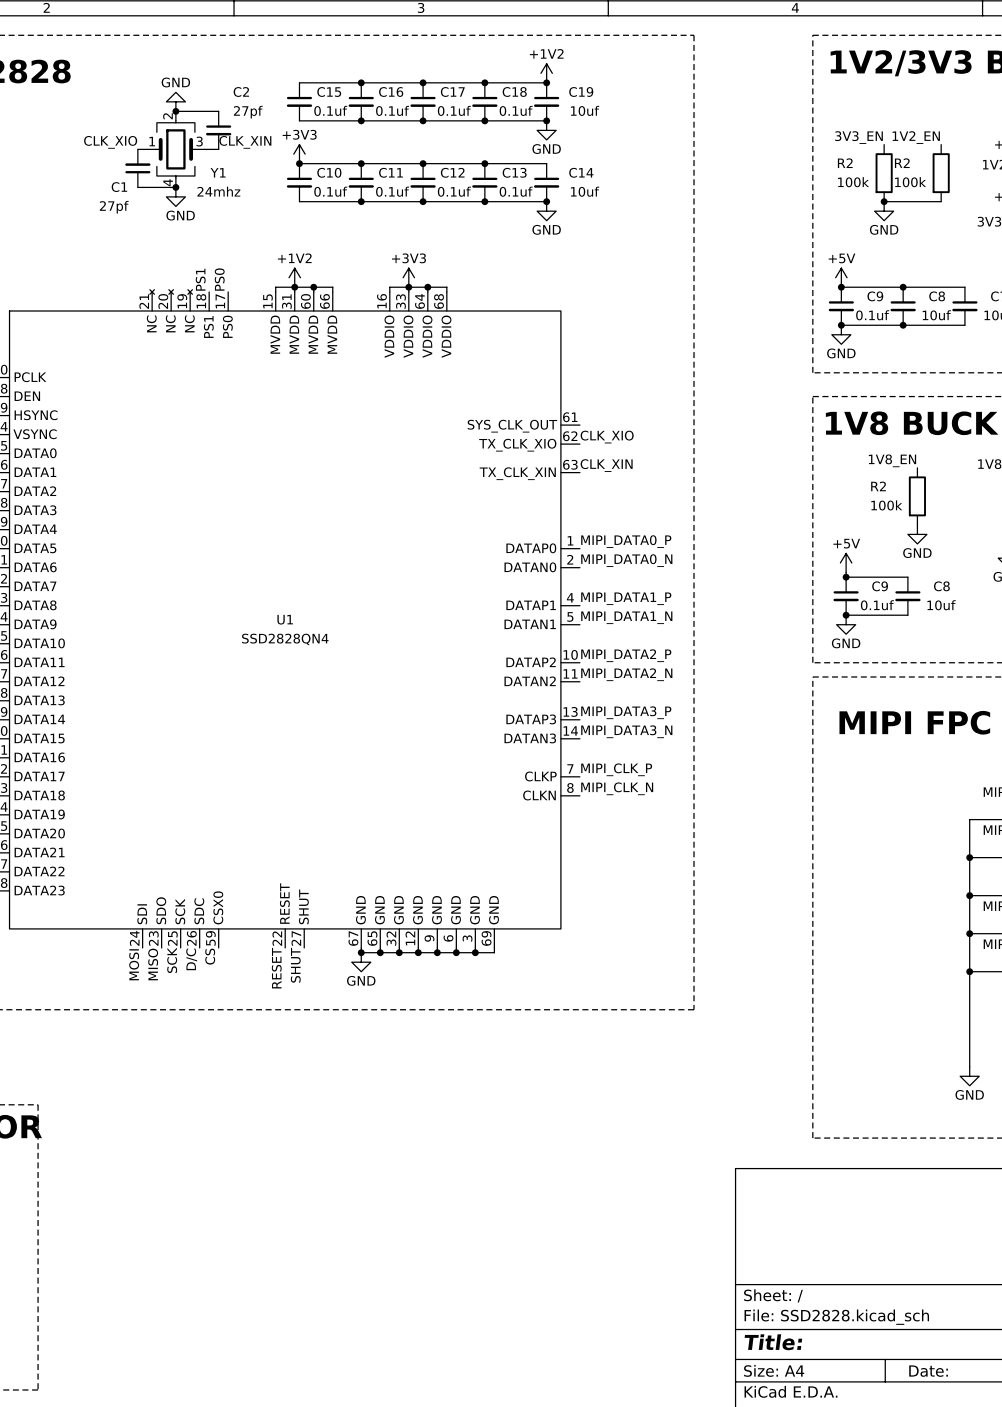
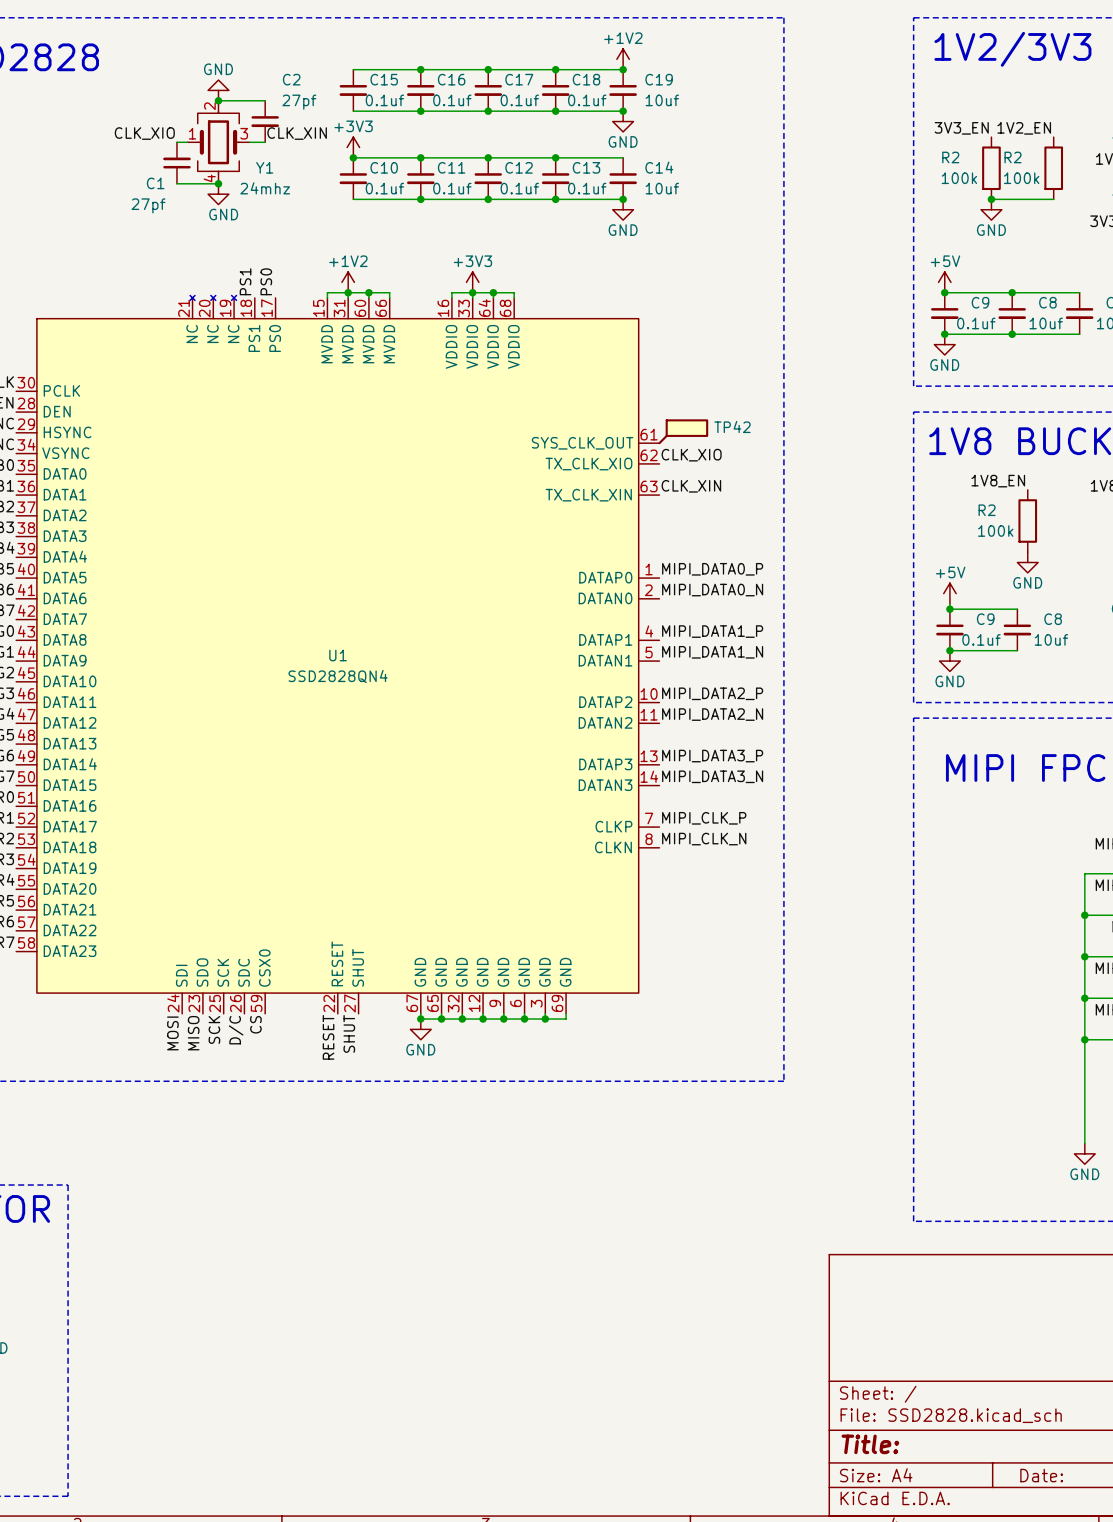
TP42: none -> (683, 431)

